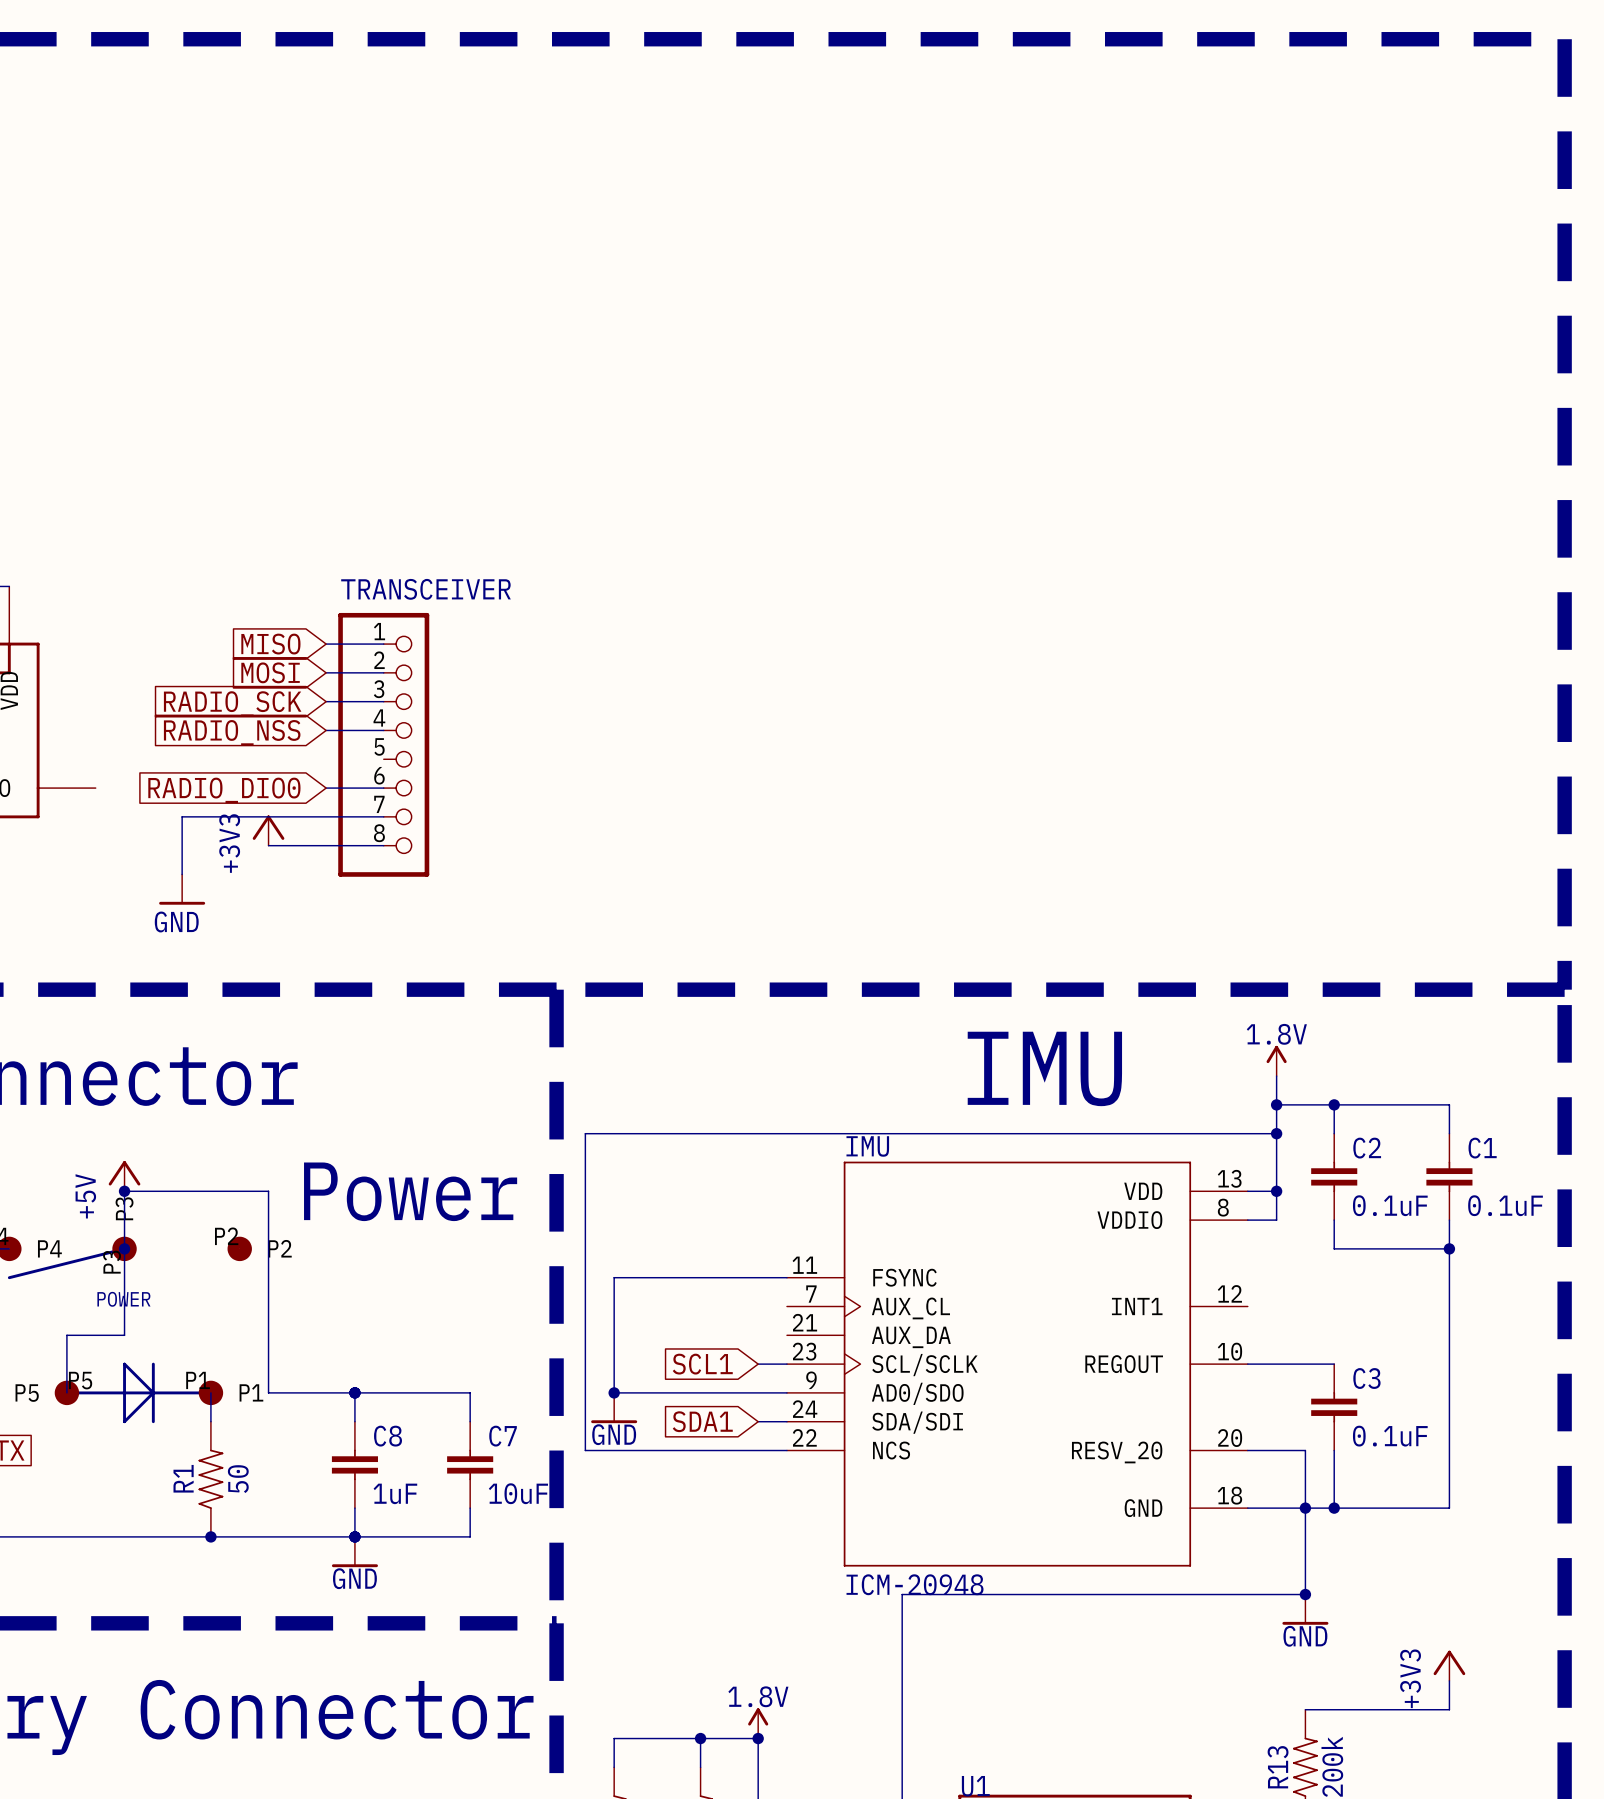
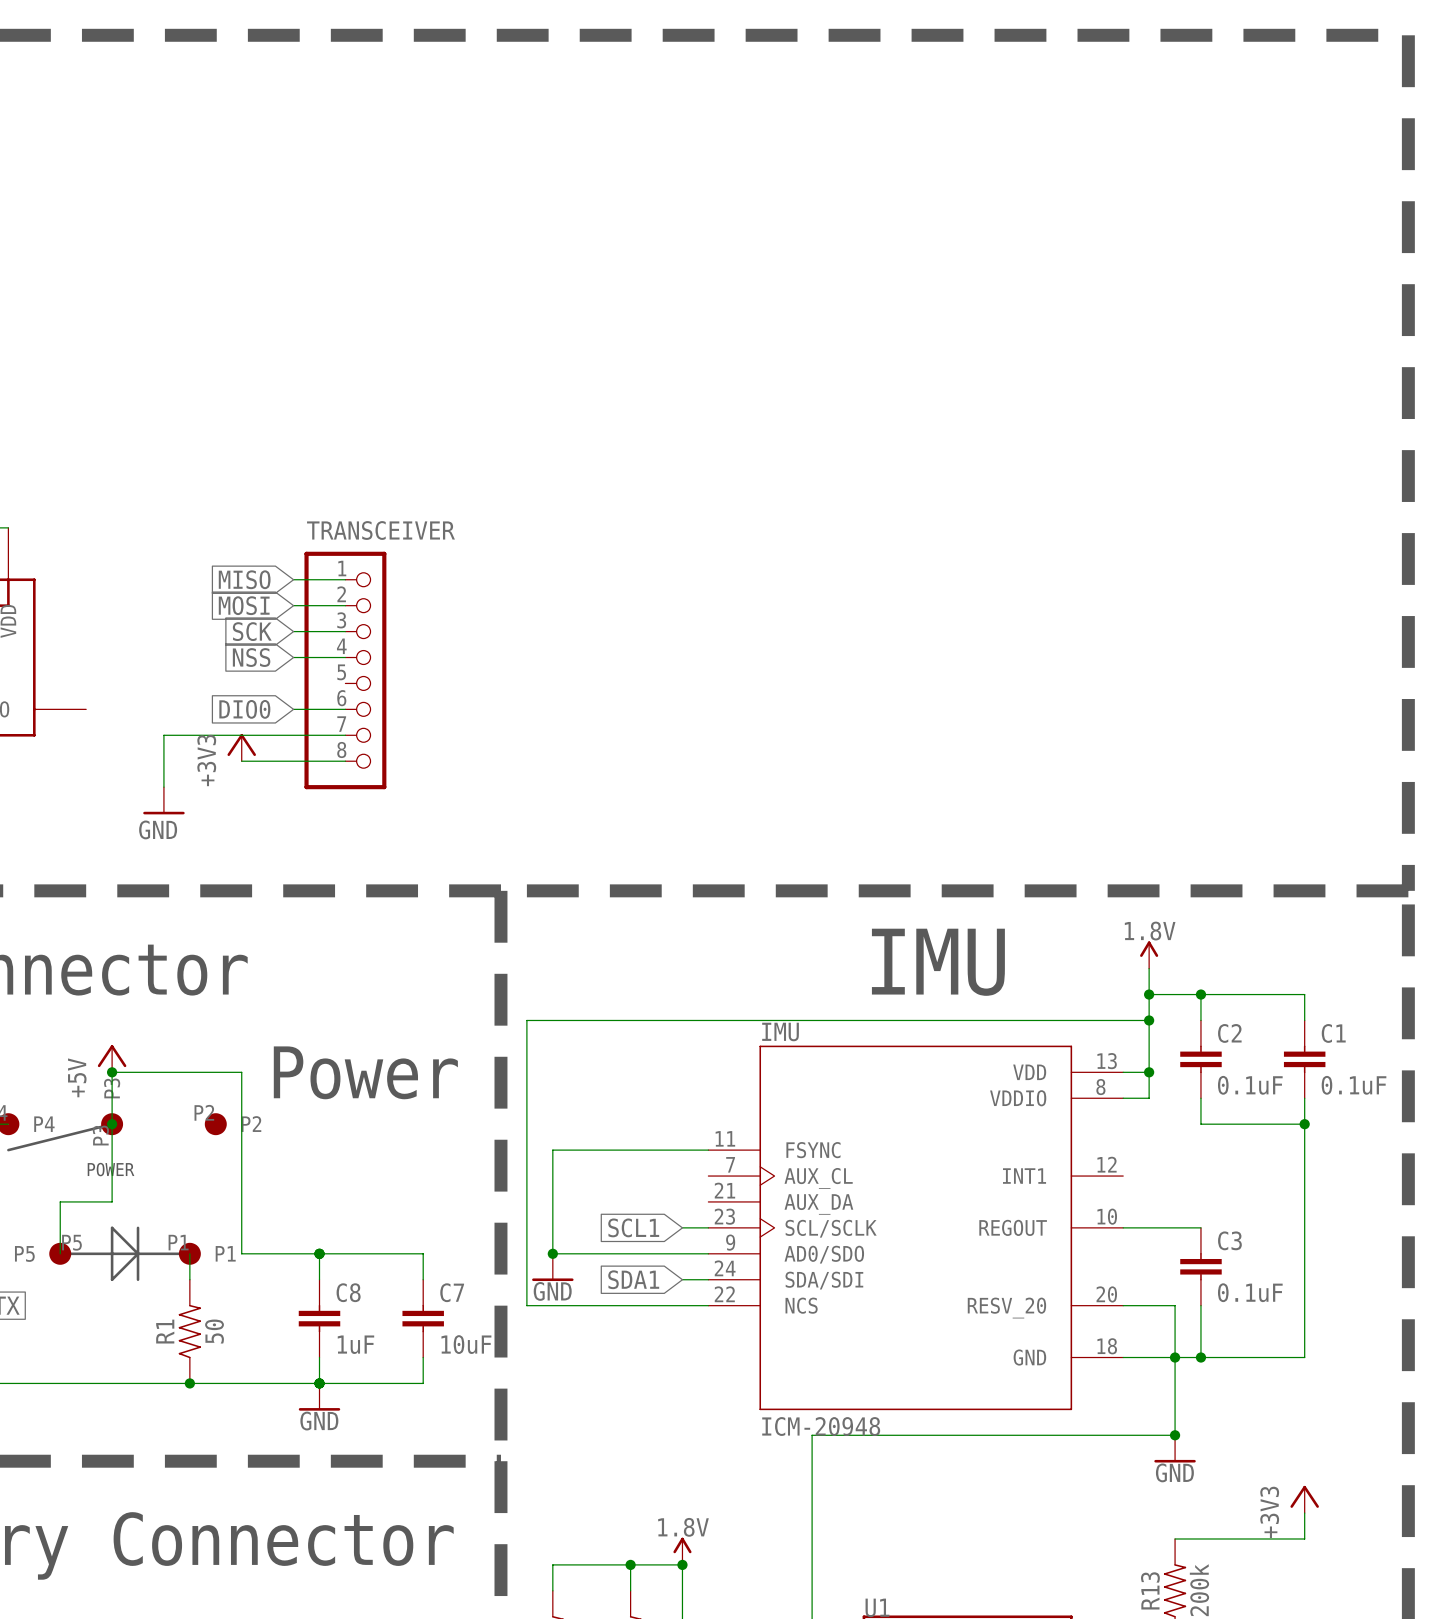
global label: RADIO_SCK (232, 703) -> SCK (252, 631)
global label: RADIO_NSS (232, 732) -> NSS (251, 657)
global label: RADIO_DIO0 (224, 790) -> DIO0 (244, 709)

